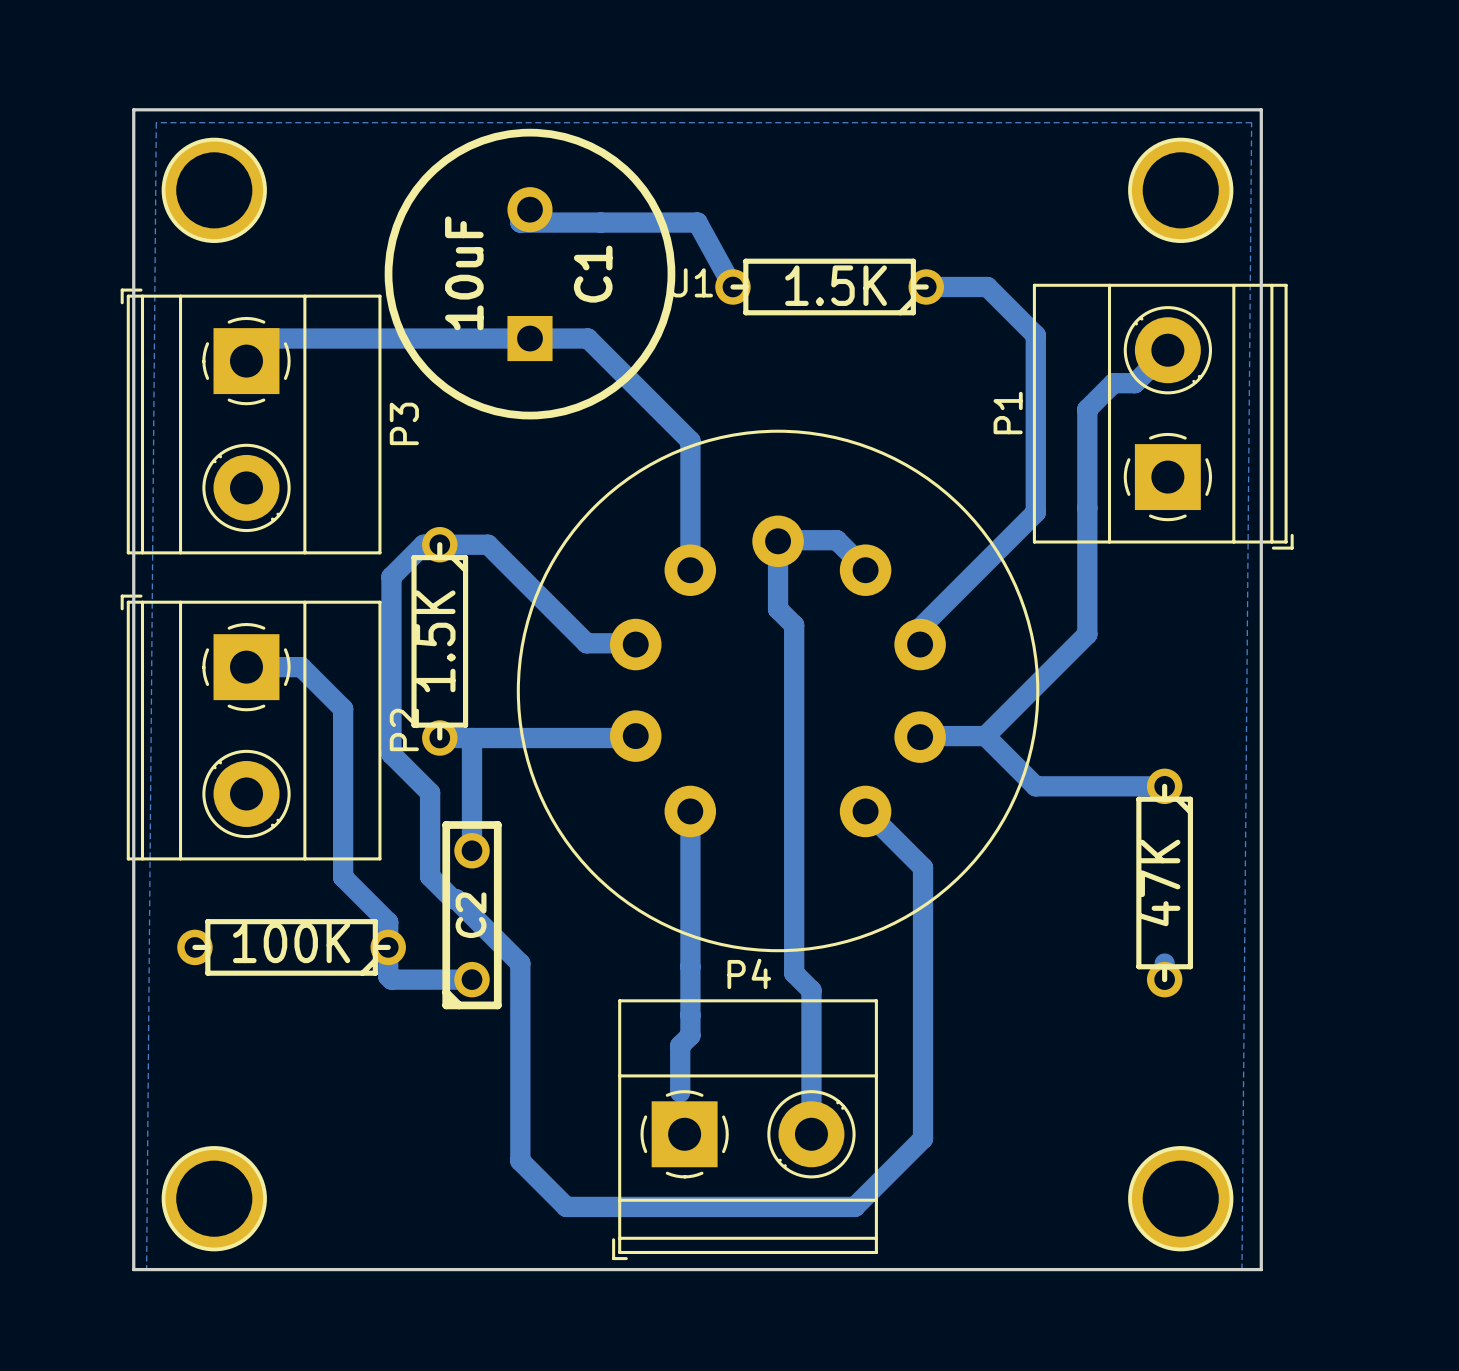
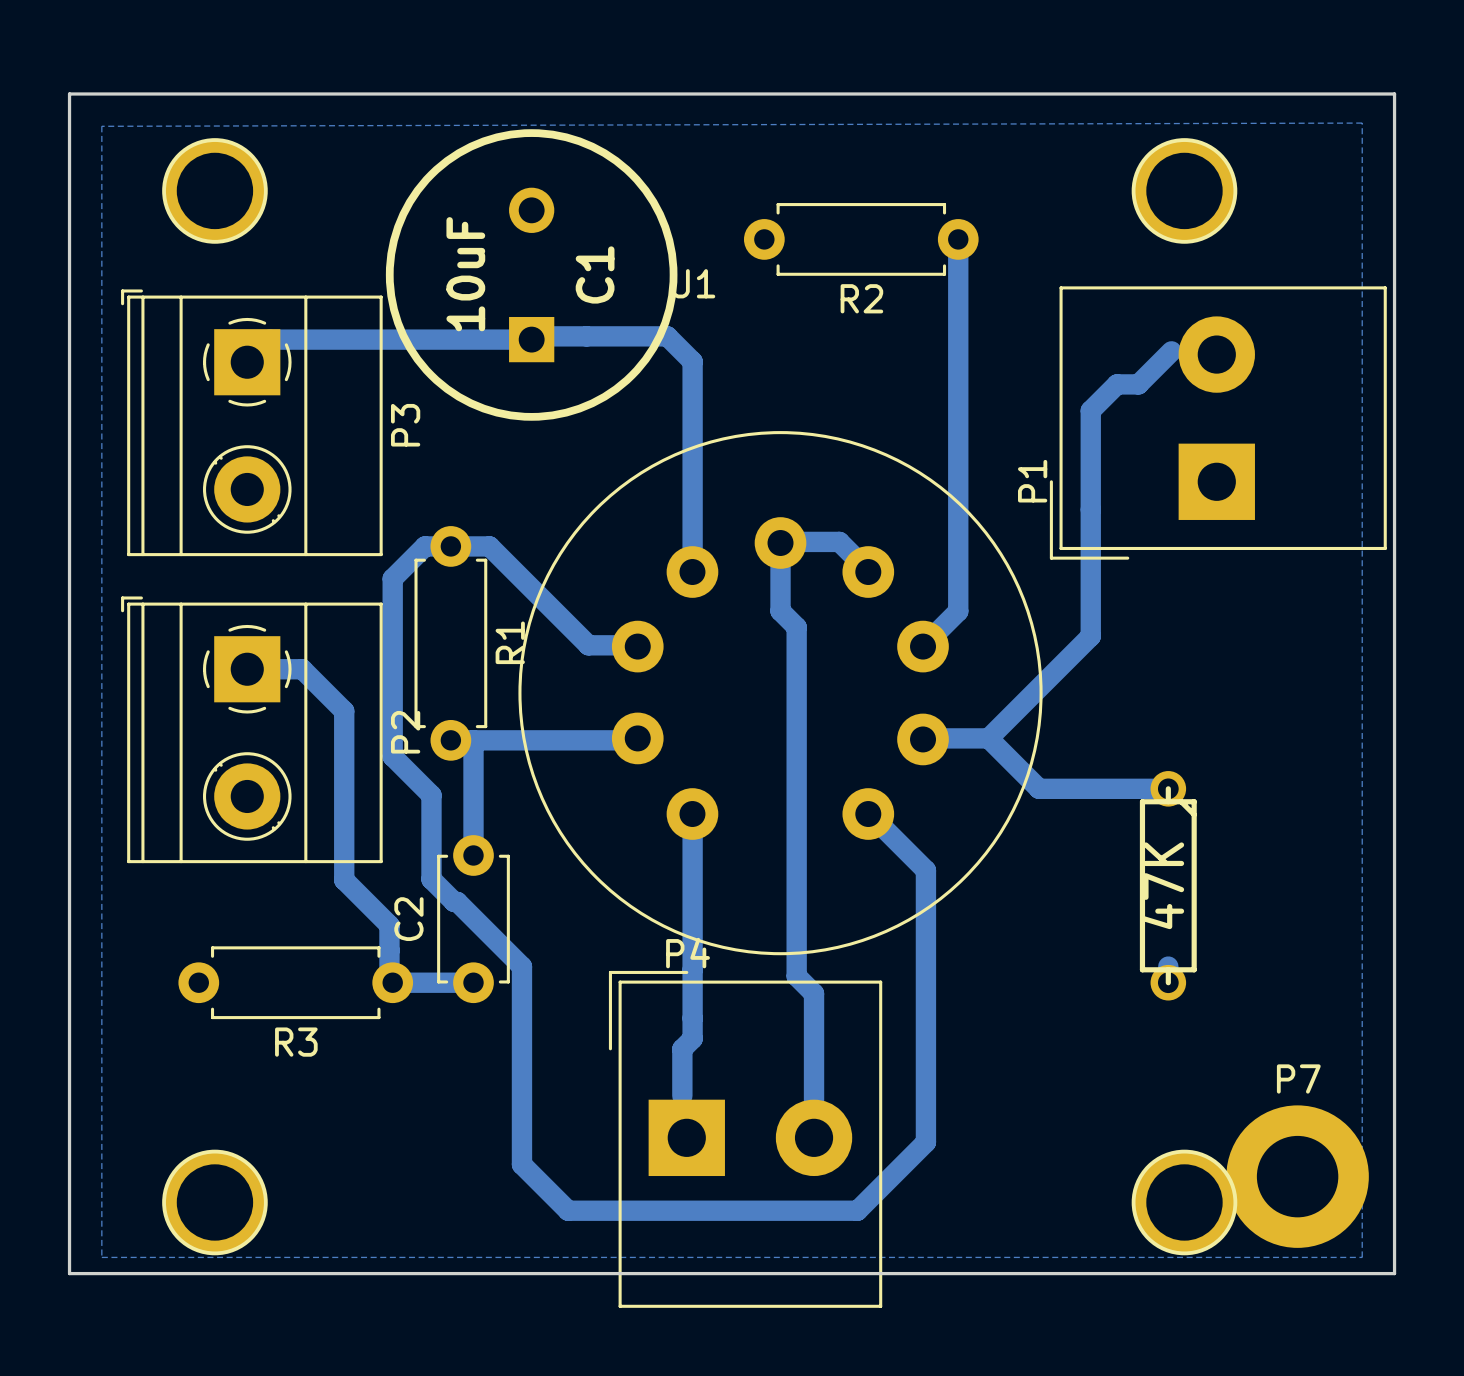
bottom zone outline: (156, 122) (1251, 122) (1241, 1269) (146, 1269) (156, 122) -> (1362, 123) (101, 126) (101, 1257) (1362, 1257) (1362, 123)
bottom track: (529, 209) (520, 222) (697, 222) (732, 286) -> none
R2: none -> (861, 239)
bottom track: none -> (958, 239) (958, 611) (923, 646)
P1 footprint: [1032, 283, 1294, 550] -> [1049, 286, 1387, 560]
part: 1.5K (829, 286) -> none
bottom track: (926, 286) (987, 286) (1035, 335) (1035, 512) (920, 627) (920, 643) -> none
bottom track: (529, 338) (587, 338) (690, 440) -> (531, 339) (534, 336) (667, 336) (692, 361) (692, 442)
P1 name position: P1 (1008, 413) -> P1 (1032, 481)
part: 1.5K (439, 641) -> none
R1: none -> (450, 643)
C2 footprint: [442, 821, 502, 1010] -> [437, 835, 510, 1004]
C2 name position: C2 (471, 915) -> C2 (408, 919)
part: 100K (291, 947) -> none
P4 name position: P4 (749, 973) -> P4 (688, 953)
R3: none -> (295, 982)
P4 footprint: [612, 999, 878, 1261] -> [608, 970, 883, 1308]
P7: none -> (1297, 1176)
board edge: (133, 1269) (133, 109) (1261, 109) (1261, 1269) -> (134, 1273) (69, 1273) (69, 93) (1394, 93) (1394, 1273) (1265, 1273)

